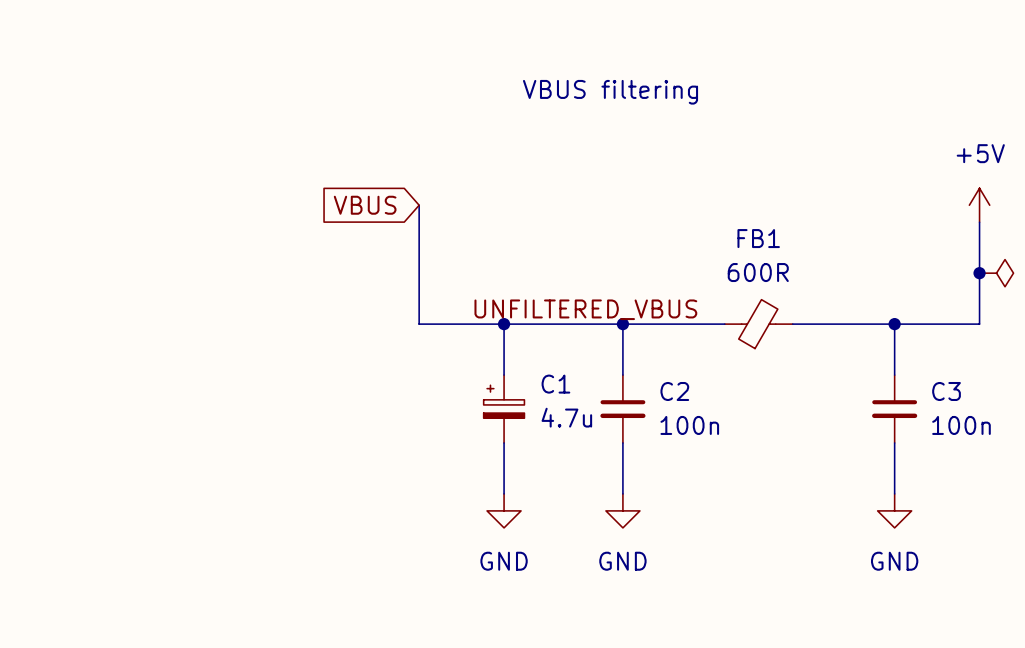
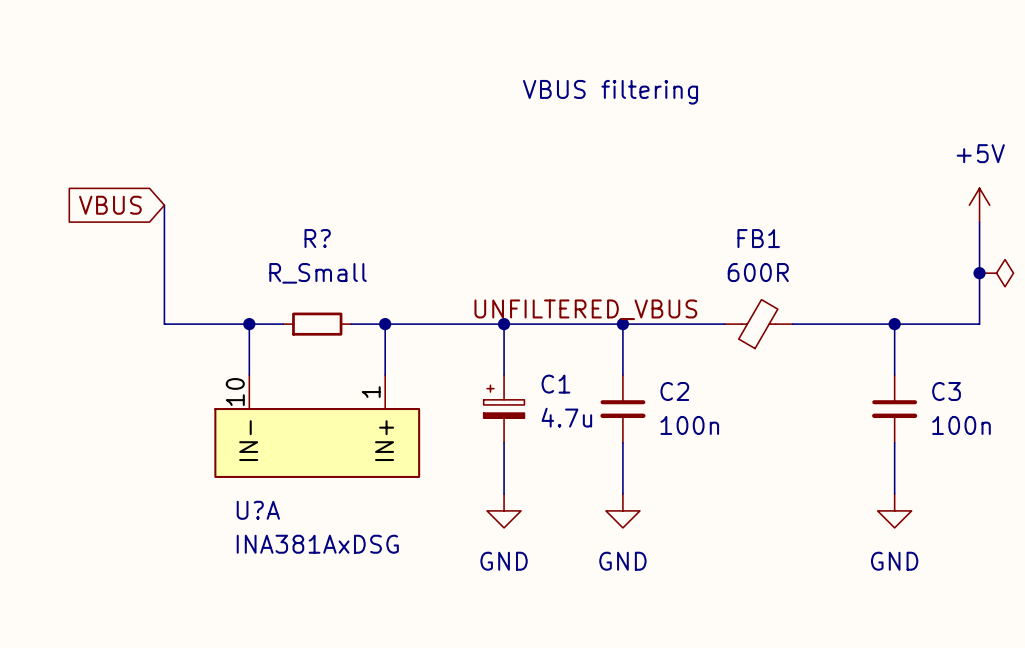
wire: none -> (164, 205) (164, 324) (283, 324)
global label position: VBUS (365, 205) -> VBUS (110, 205)
wire: (419, 205) (419, 324) -> (351, 324) (419, 324)
wire: none -> (249, 324) (249, 375)
junction: none -> (249, 324)
R?: none -> R_Small (317, 324)
wire: none -> (385, 324) (385, 375)
junction: none -> (385, 324)
U?A: none -> INA381AxDSG (317, 426)

